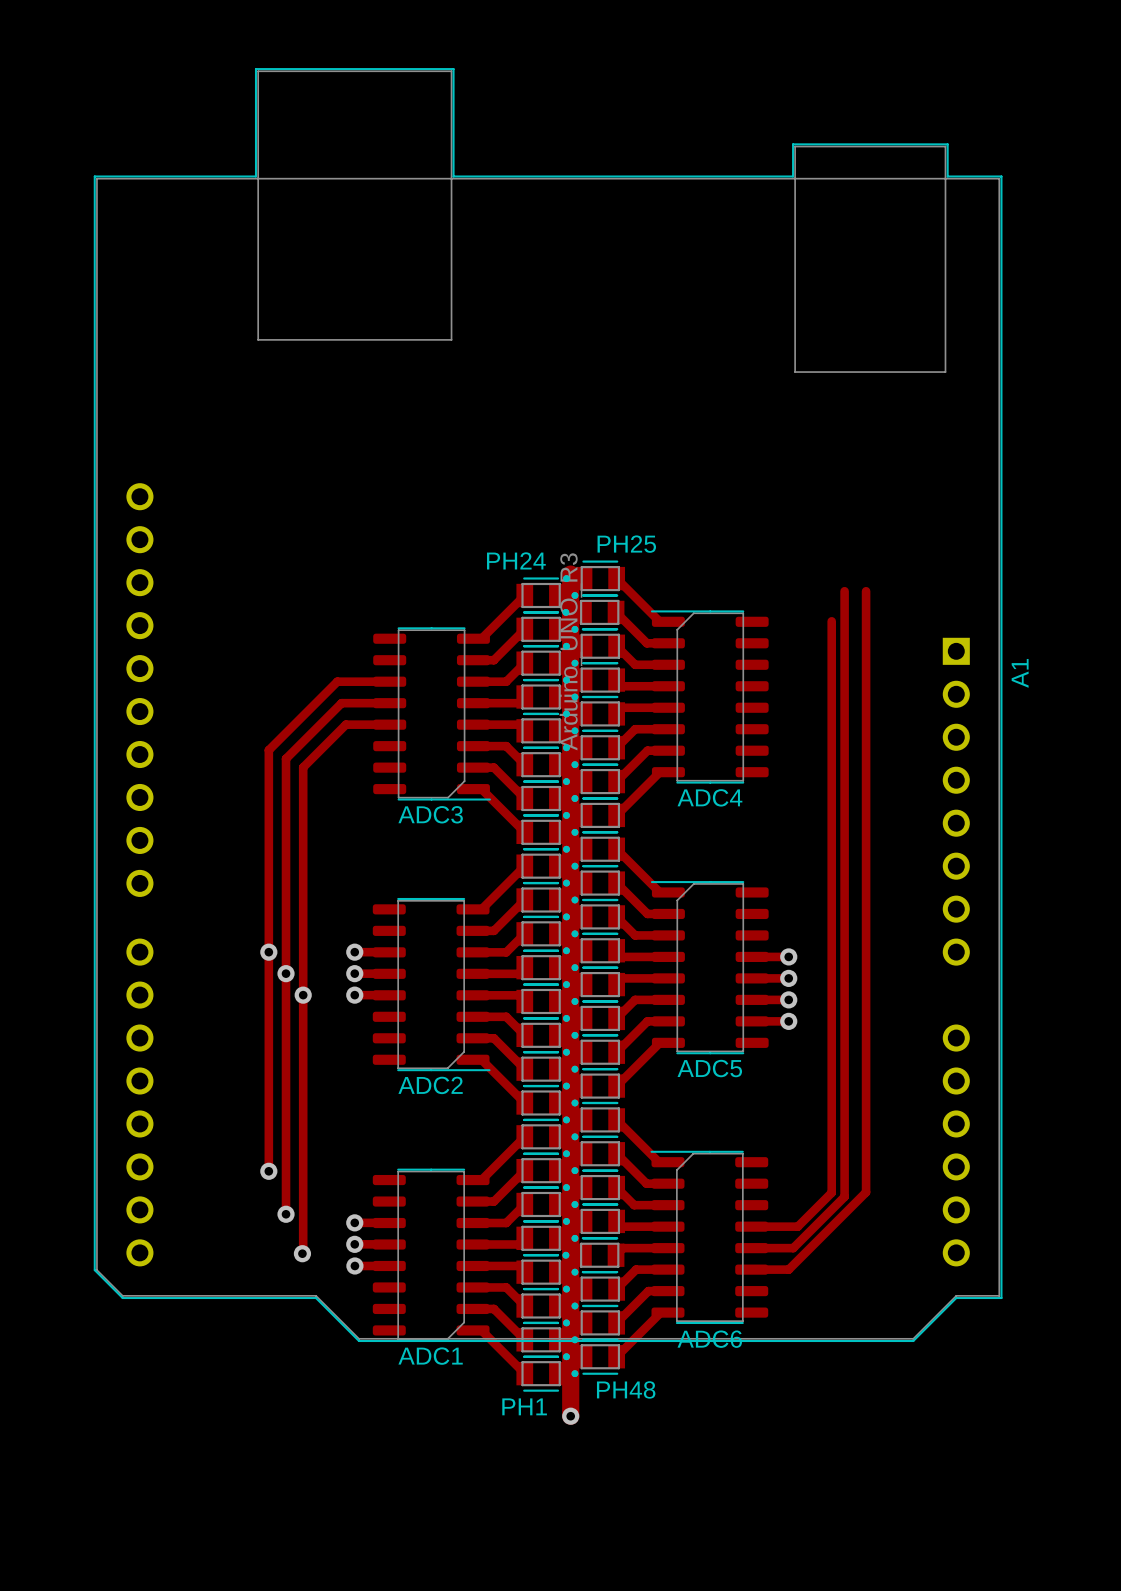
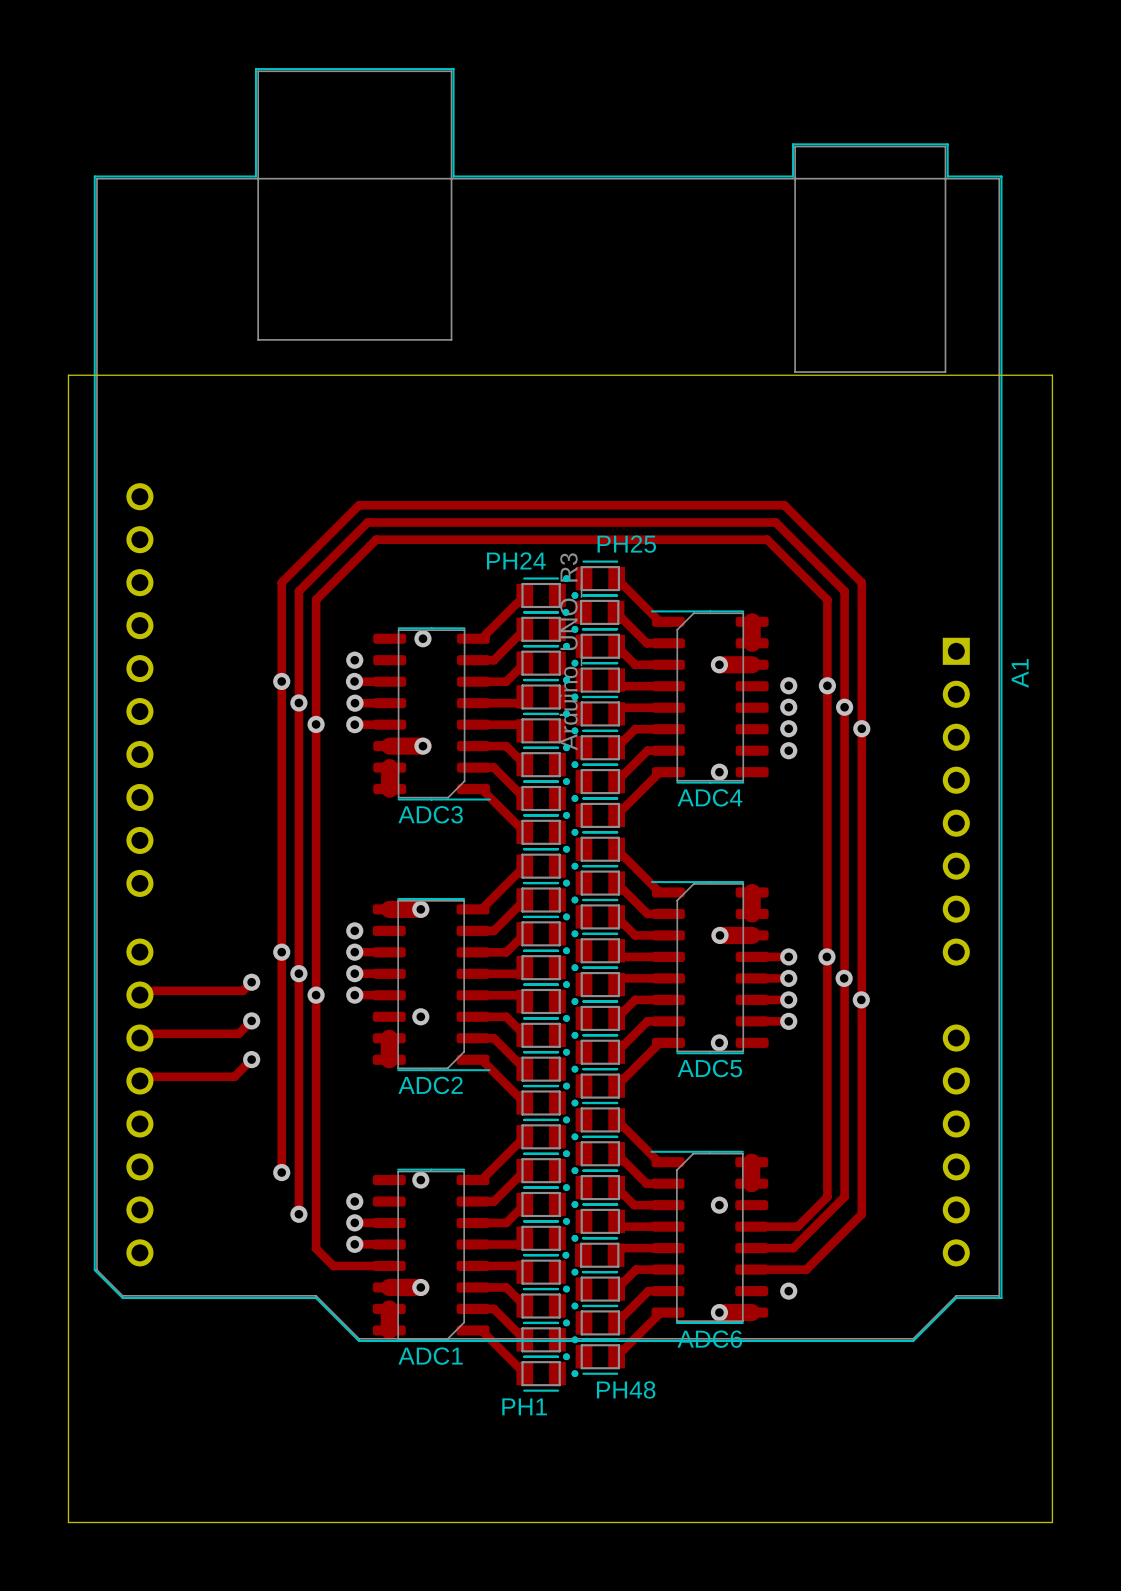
board edge: none -> (68, 375) (1052, 375) (1052, 1522) (68, 1522) (68, 375)
track: (570, 574) (570, 1416) -> none
track: none -> (844, 591) (775, 522) (367, 522) (298, 591) (298, 1214)
track: (866, 591) (866, 1192) (788, 1269) -> (281, 1172) (281, 582) (359, 505) (784, 505) (861, 582) (861, 1214) (806, 1269) (788, 1269)
track: none -> (752, 621) (752, 643)
track: (831, 621) (831, 1192) (827, 1197) -> (354, 1265) (333, 1265) (316, 1248) (316, 599) (376, 539) (767, 539) (827, 599) (827, 1197)
via: none -> (422, 638)
via: none -> (354, 660)
track: none -> (719, 664) (752, 664)
via: none -> (719, 664)
via: none -> (281, 681)
track: (354, 681) (337, 681) (268, 750) (268, 1171) -> none
via: none -> (354, 681)
via: none -> (788, 685)
via: none -> (827, 685)
via: none -> (298, 702)
track: (354, 703) (341, 703) (286, 758) (286, 1214) -> none
via: none -> (354, 703)
via: none -> (788, 707)
via: none -> (844, 707)
via: none -> (316, 724)
track: (354, 724) (345, 724) (303, 767) (302, 1253) -> none
via: none -> (354, 724)
via: none -> (788, 728)
via: none -> (861, 728)
track: none -> (389, 746) (422, 746)
via: none -> (422, 746)
via: none -> (788, 750)
track: none -> (389, 767) (389, 789)
via: none -> (719, 772)
track: none -> (752, 892) (752, 913)
track: none -> (389, 909) (420, 909)
via: none -> (420, 909)
via: none -> (354, 930)
track: none -> (719, 935) (752, 935)
via: none -> (719, 935)
via position: (268, 952) -> (281, 952)
via: none -> (826, 956)
via position: (286, 973) -> (298, 973)
via: none -> (844, 978)
track: none -> (251, 982) (243, 990) (152, 990)
via: none -> (251, 982)
via position: (303, 995) -> (316, 995)
via: none -> (861, 999)
via: none -> (420, 1016)
track: none -> (251, 1020) (238, 1033) (152, 1033)
via: none -> (251, 1020)
track: none -> (389, 1038) (389, 1059)
via: none -> (719, 1042)
track: none -> (251, 1059) (234, 1076) (152, 1076)
via: none -> (251, 1059)
track: none -> (751, 1162) (751, 1183)
via position: (268, 1171) -> (281, 1172)
via: none -> (420, 1180)
via: none -> (354, 1201)
via: none -> (719, 1205)
via position: (286, 1214) -> (298, 1214)
via: (302, 1253) -> none
via: (354, 1265) -> none
track: none -> (389, 1287) (420, 1287)
via: none -> (420, 1287)
via: none -> (788, 1291)
track: none -> (389, 1308) (389, 1330)
track: none -> (719, 1312) (751, 1312)
via: none -> (719, 1312)
via: (570, 1416) -> none

